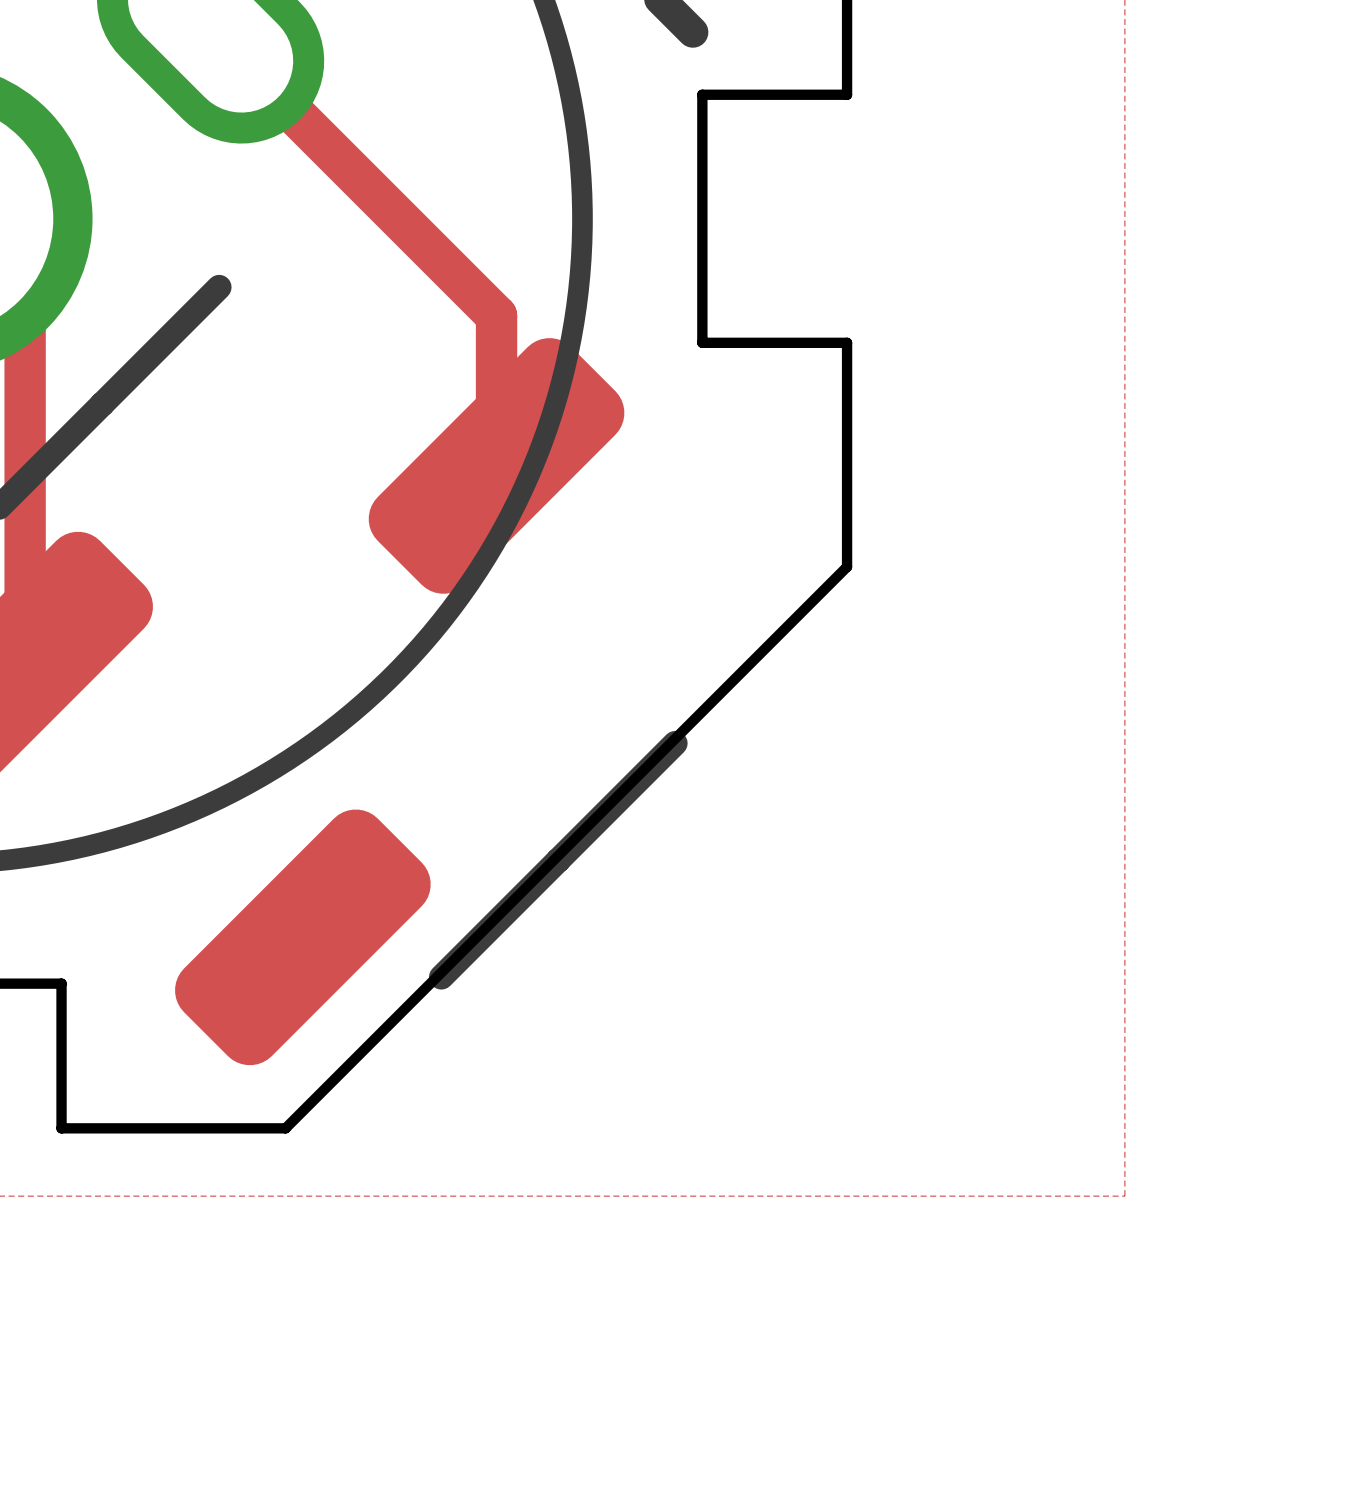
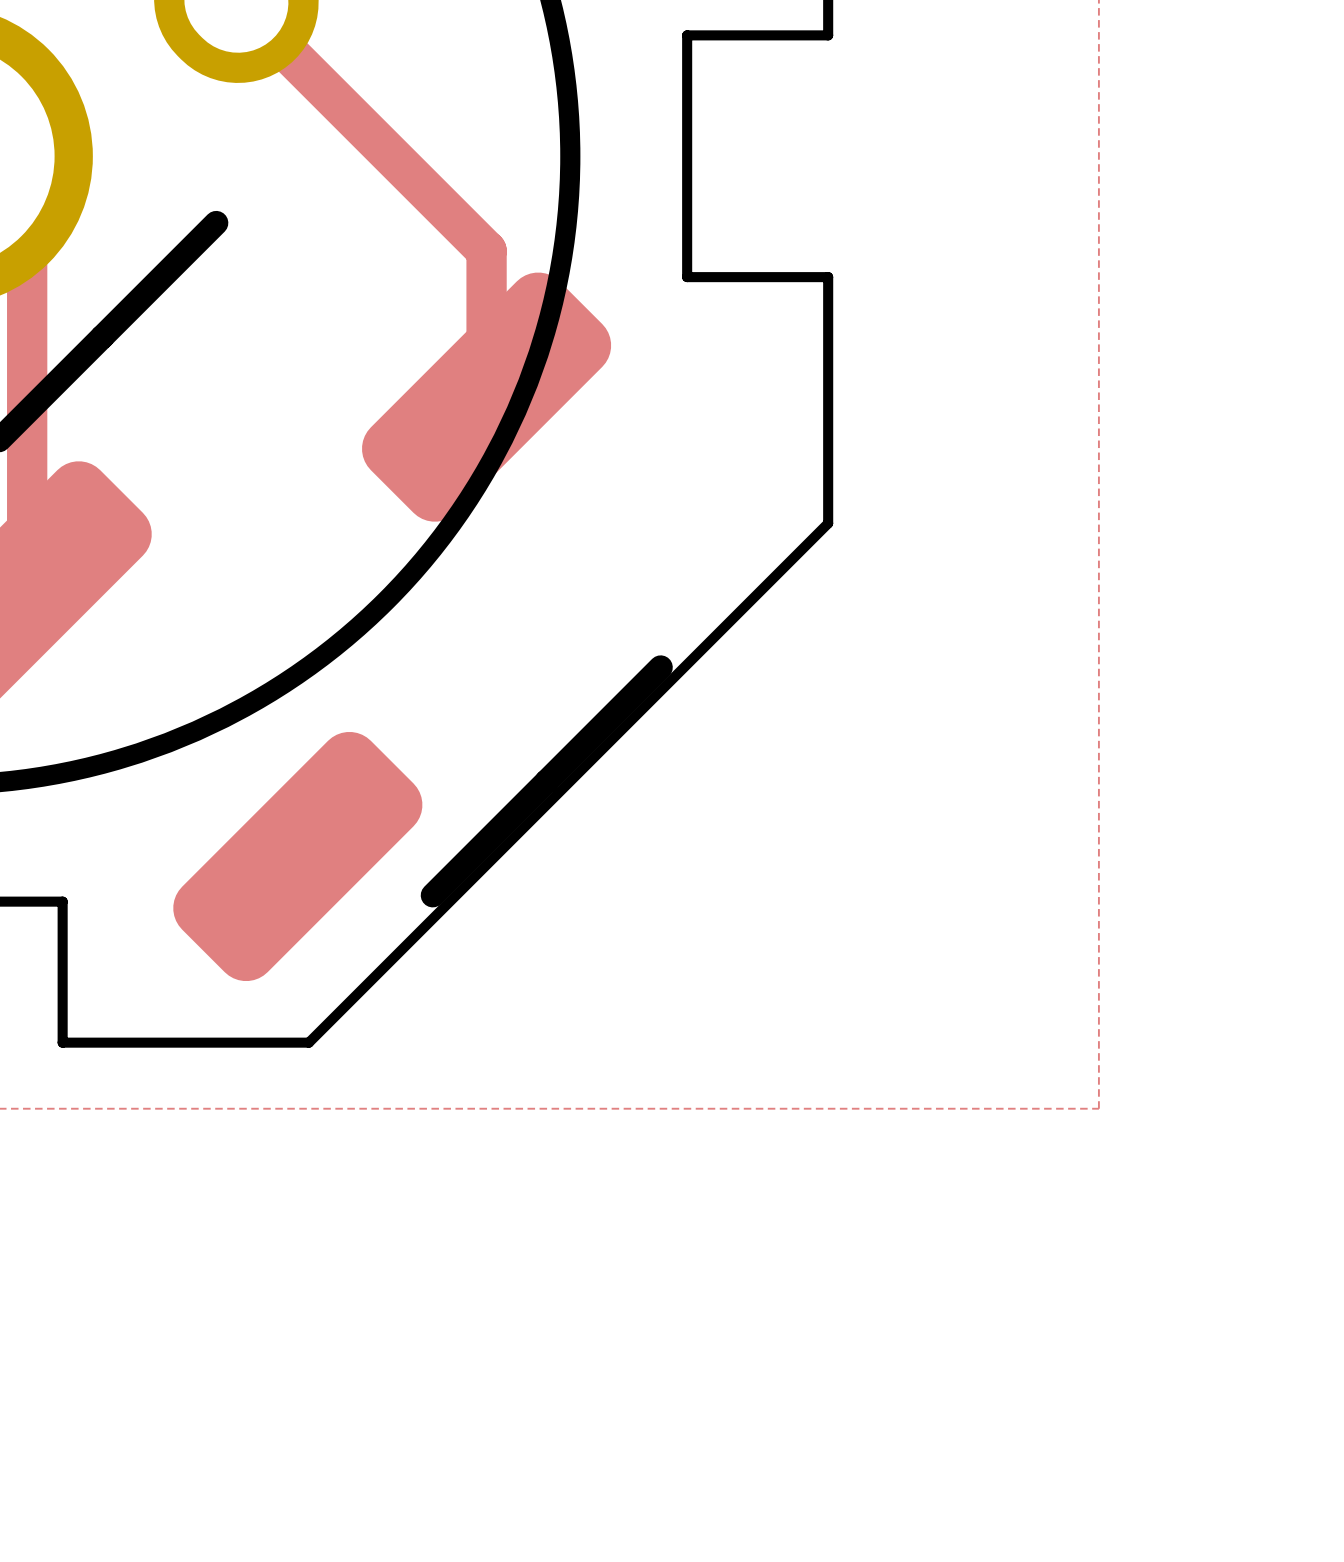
board edge: (847, 566) (285, 1128) -> (828, 495) (828, 523) (308, 1042) (280, 1042)

